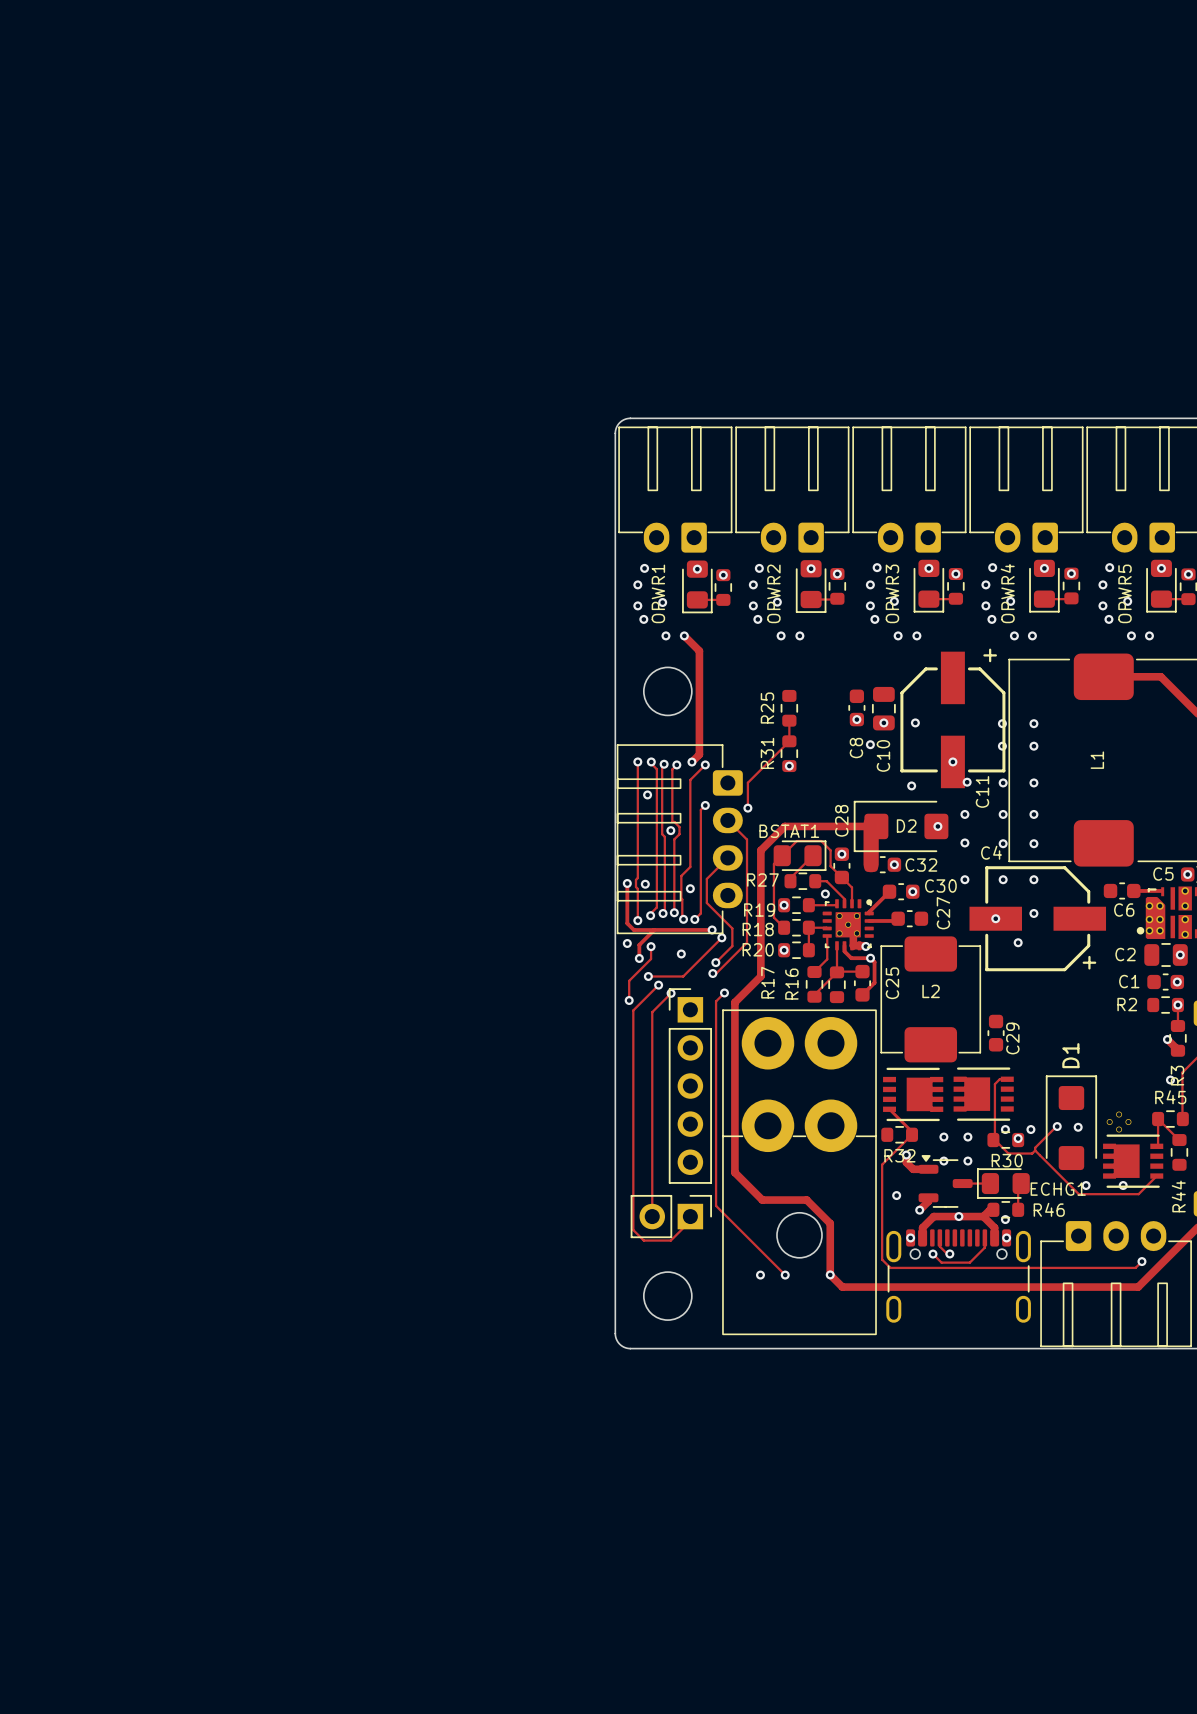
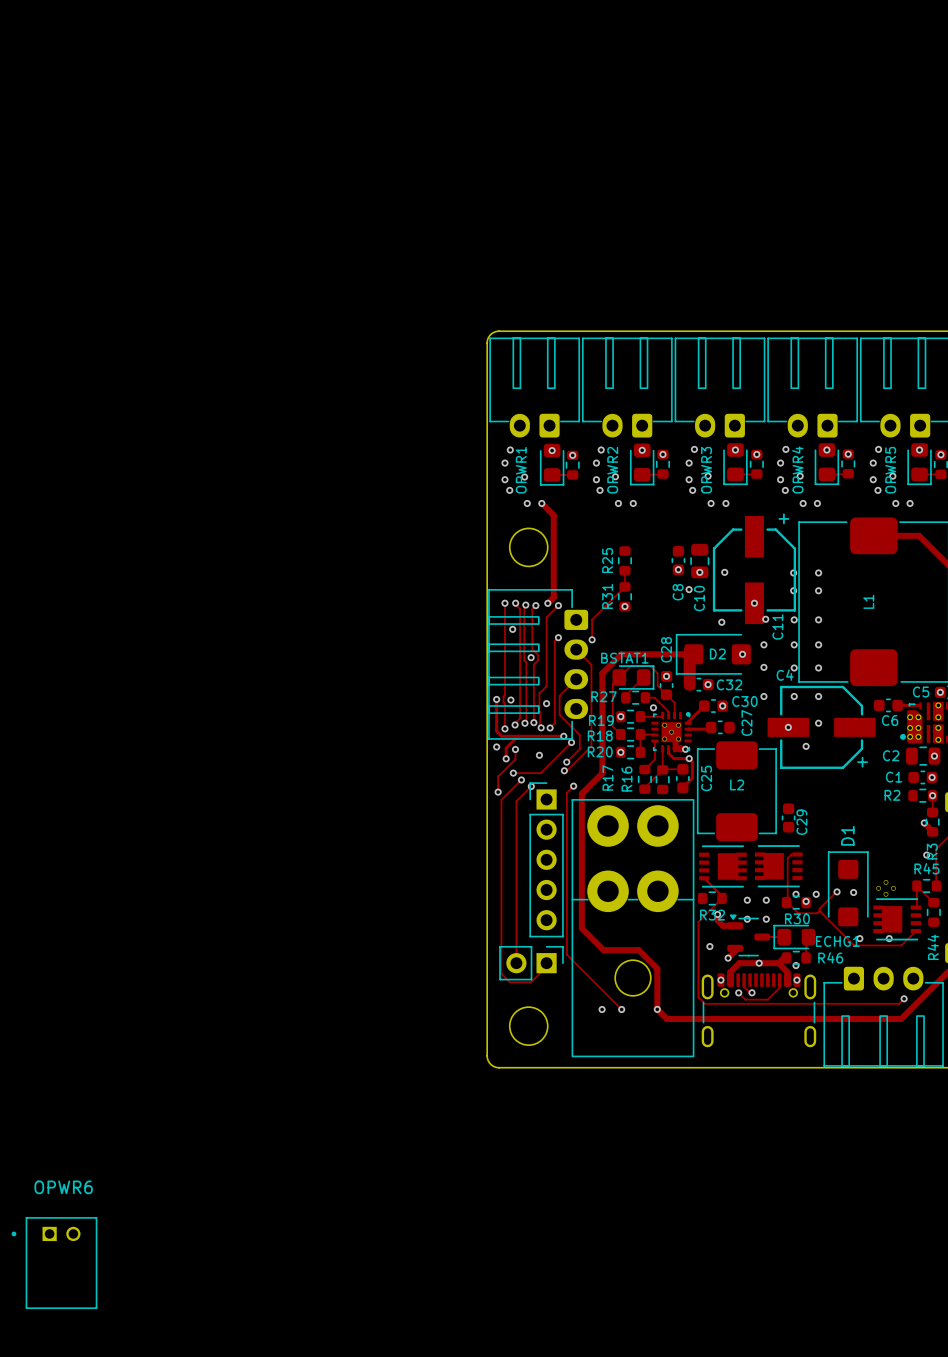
OPWR6: none -> (54, 1263)

